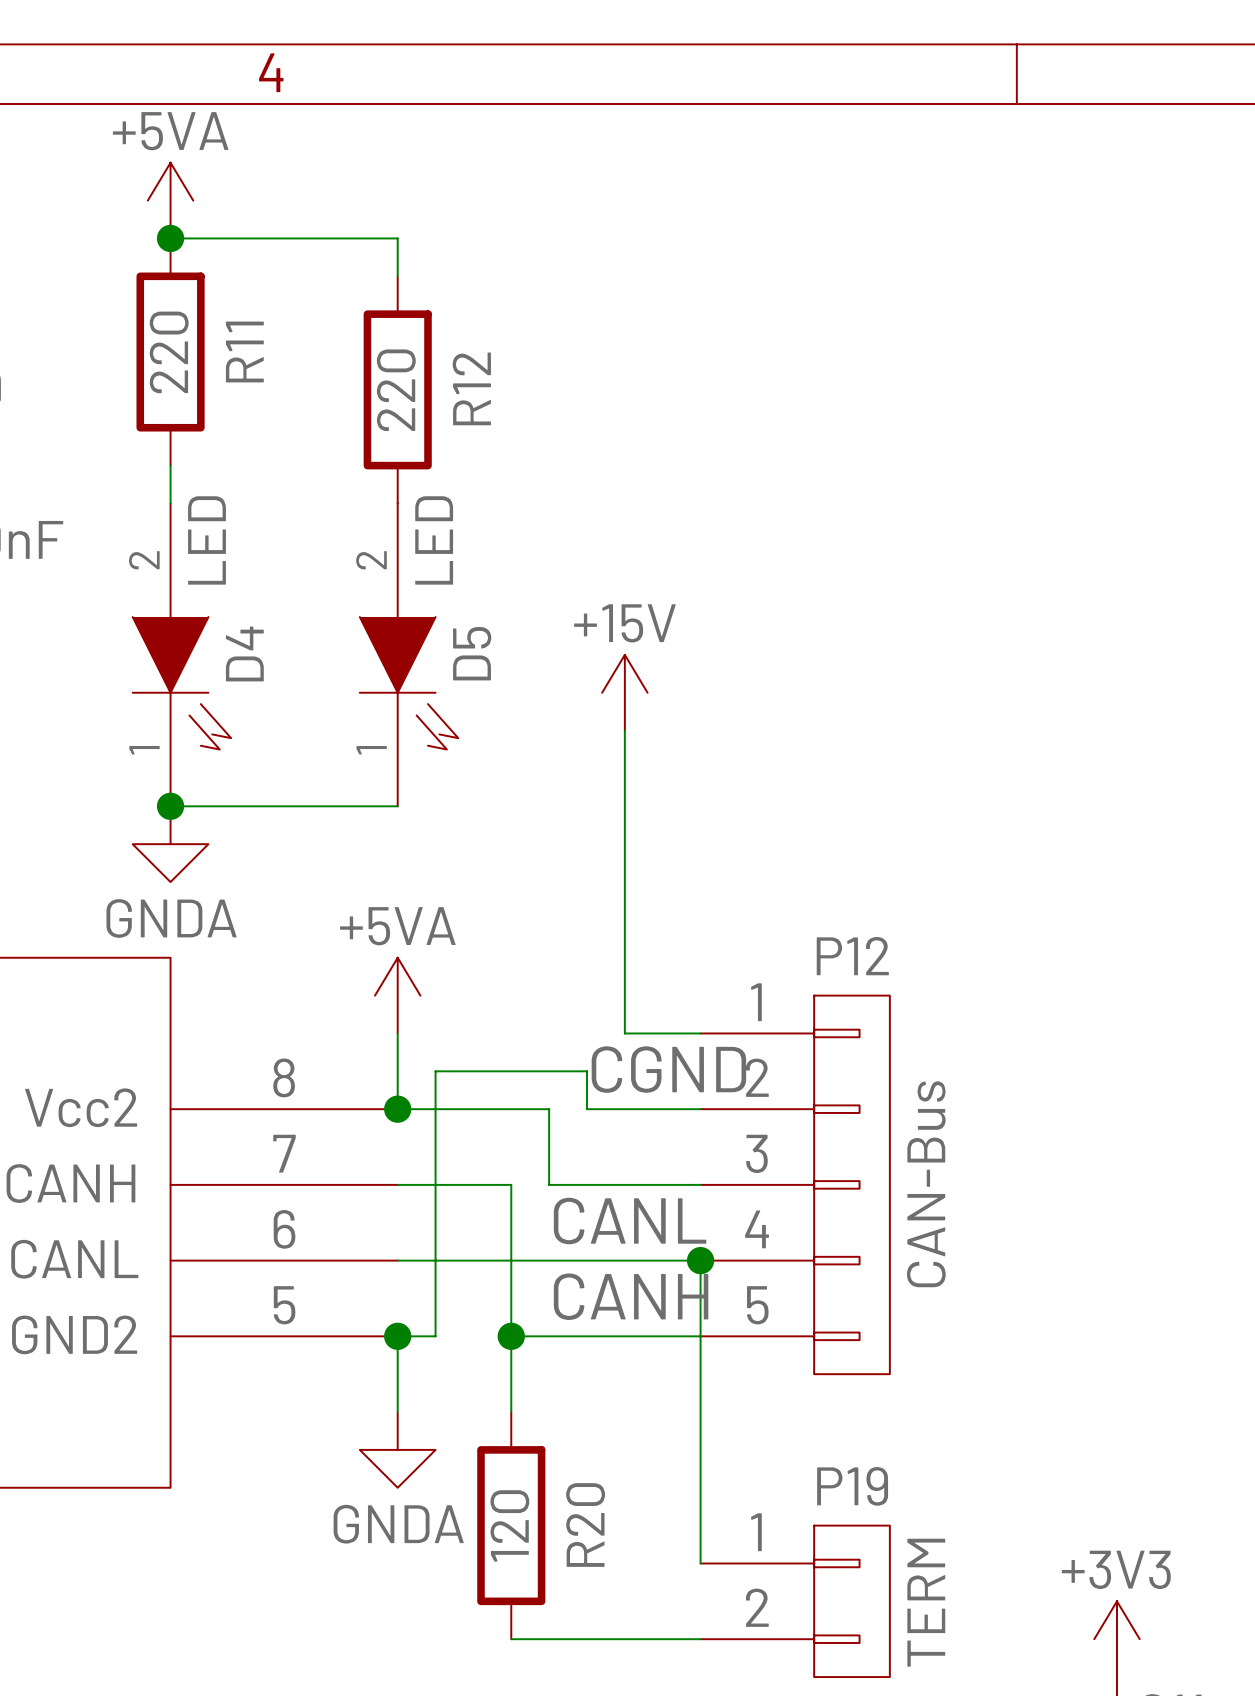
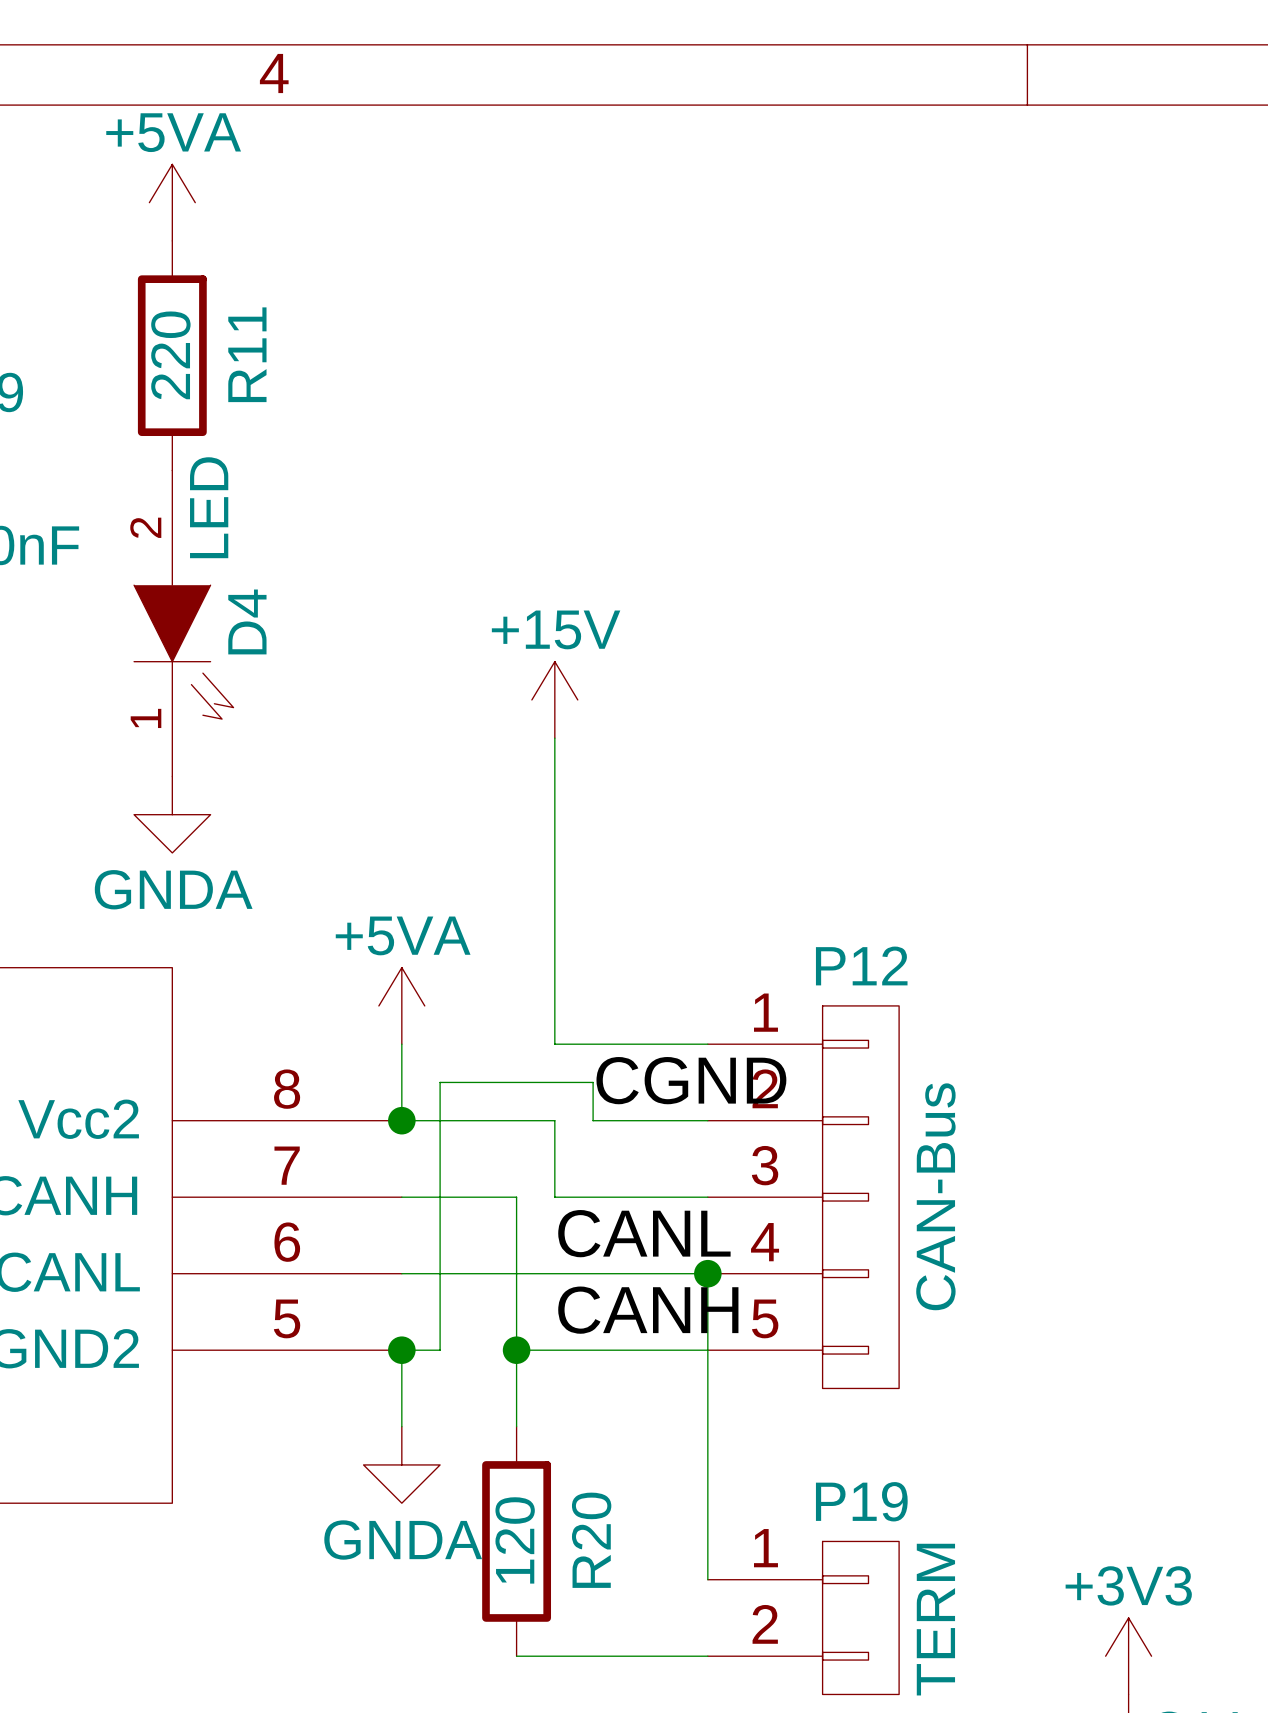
wire: (170, 238) (397, 238) (397, 276) -> none
junction: (170, 238) -> none
R12: 220 (397, 389) -> none
D4 position: (181, 654) -> (183, 623)
D5: LED (409, 654) -> none
power symbol position: +15V (624, 692) -> +15V (554, 699)
wire: (624, 730) (624, 1033) -> (554, 738) (554, 1044) (631, 1044)
wire: (170, 806) (397, 806) -> none
junction: (170, 806) -> none
power symbol position: GNDA (170, 844) -> GNDA (172, 814)

